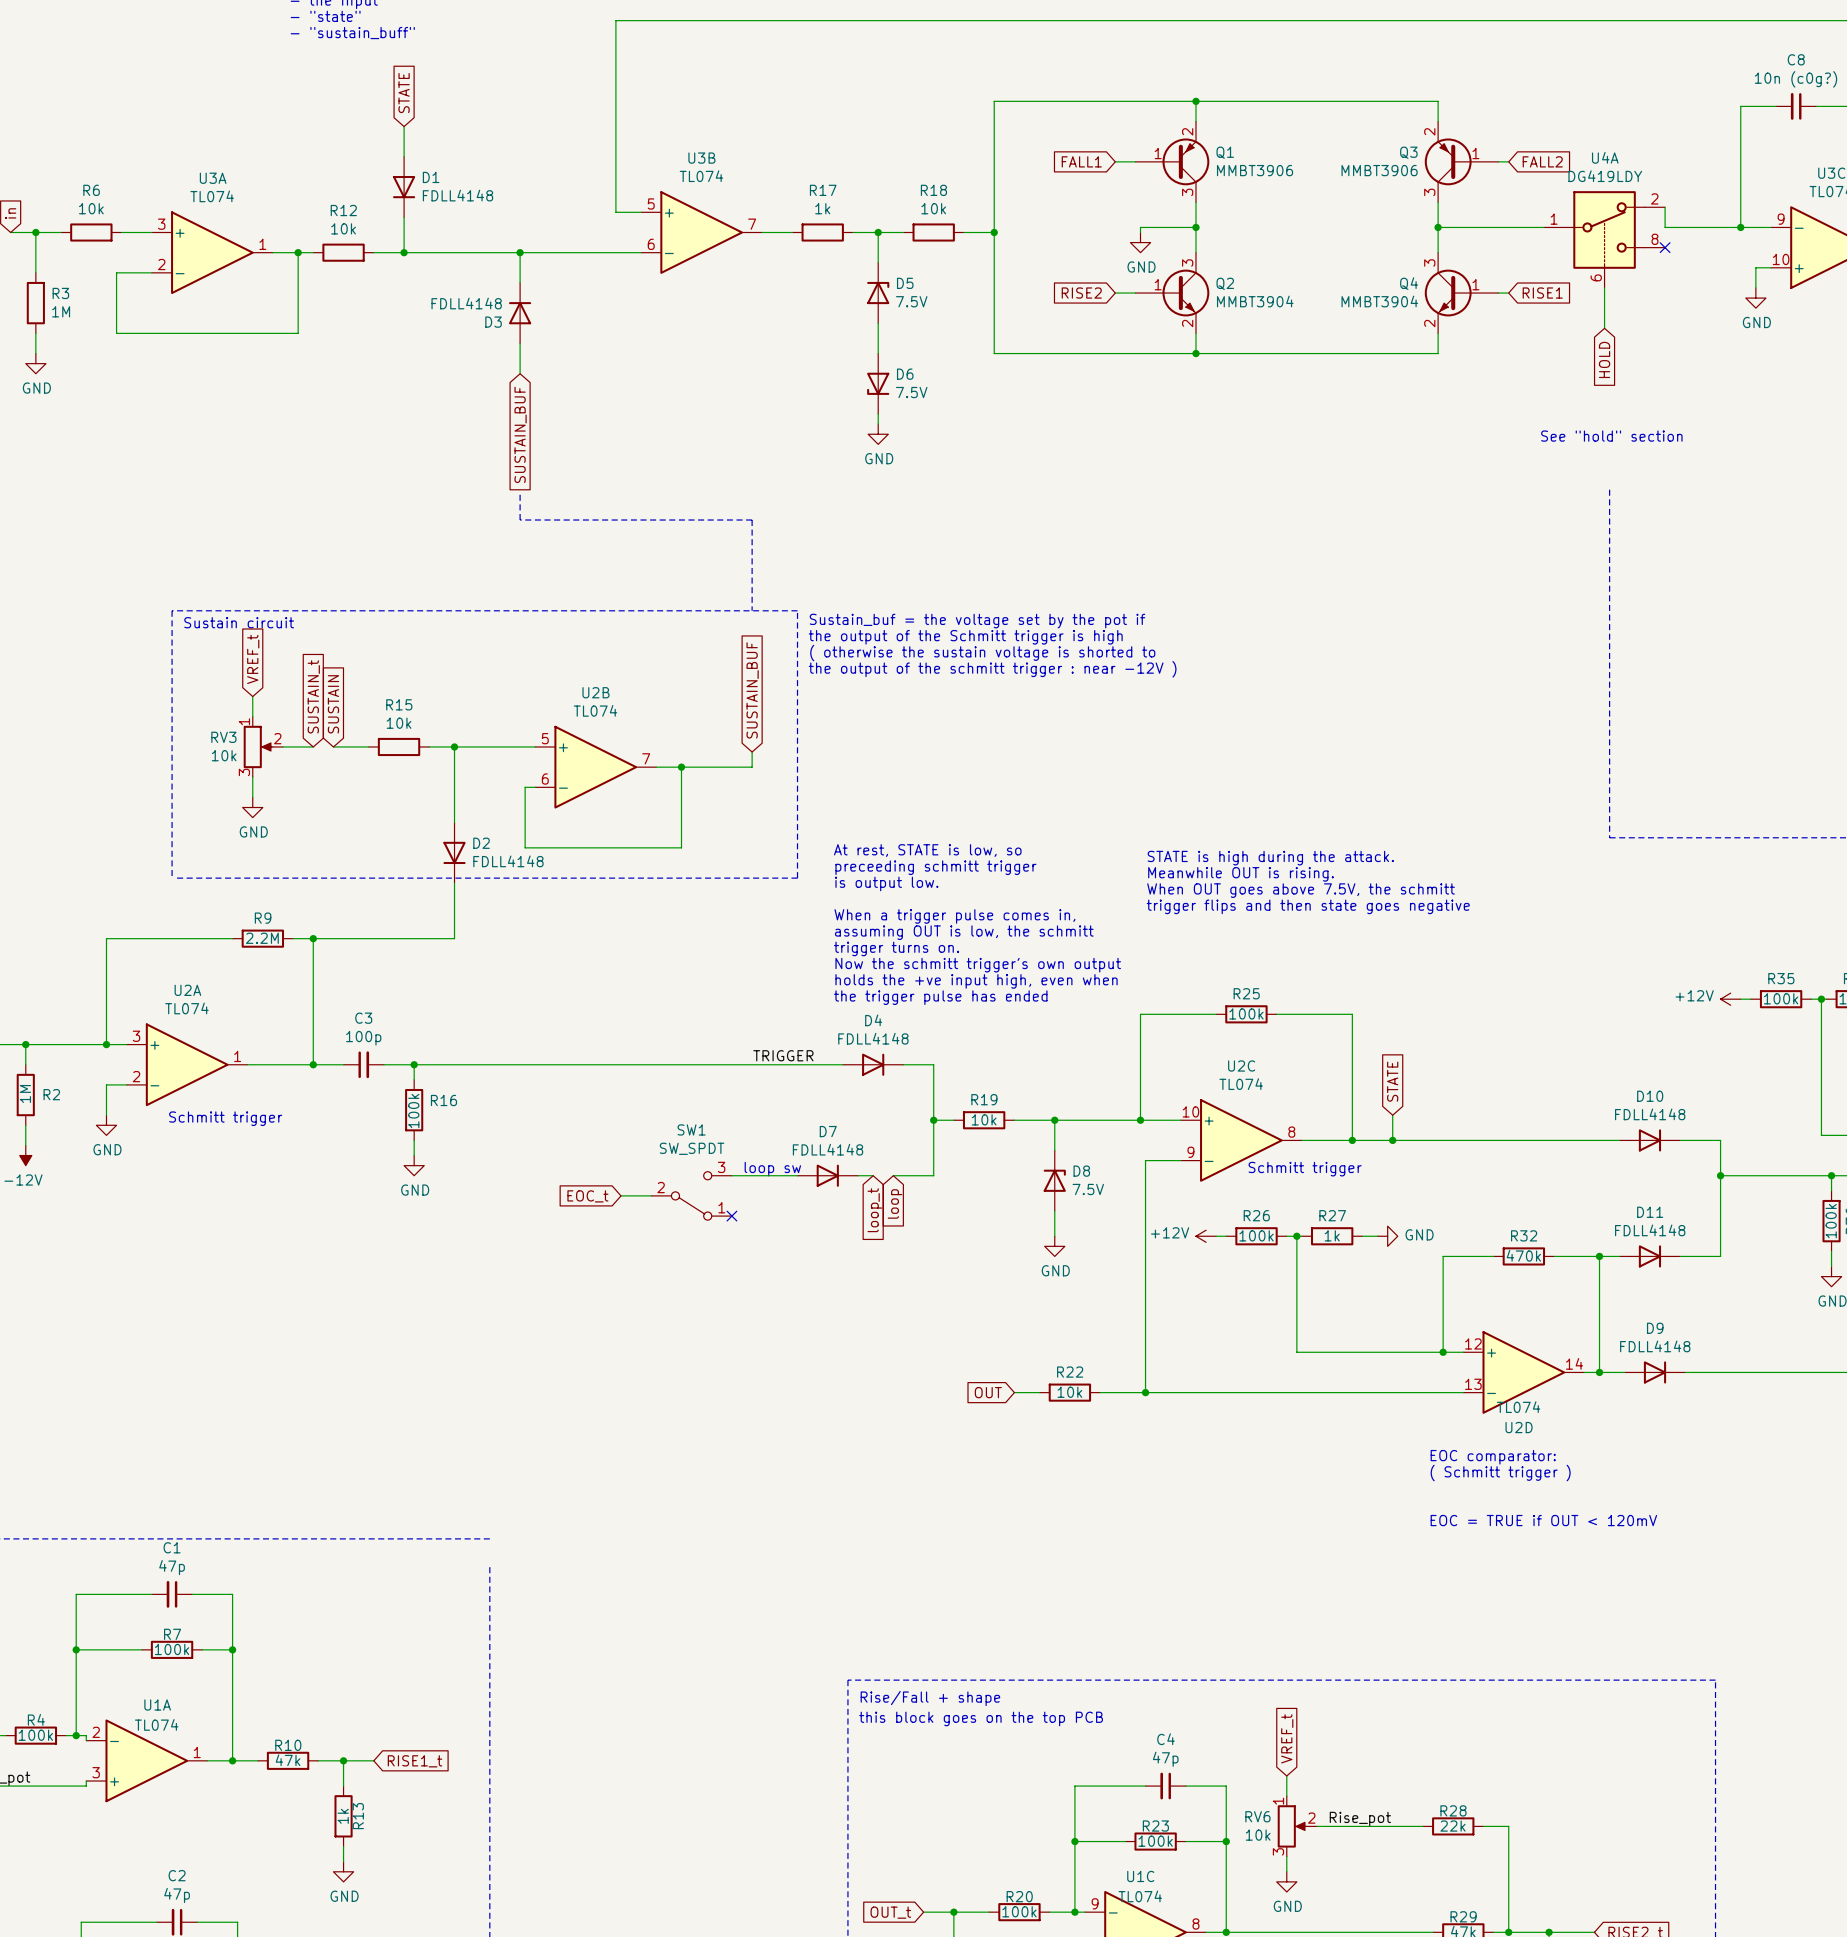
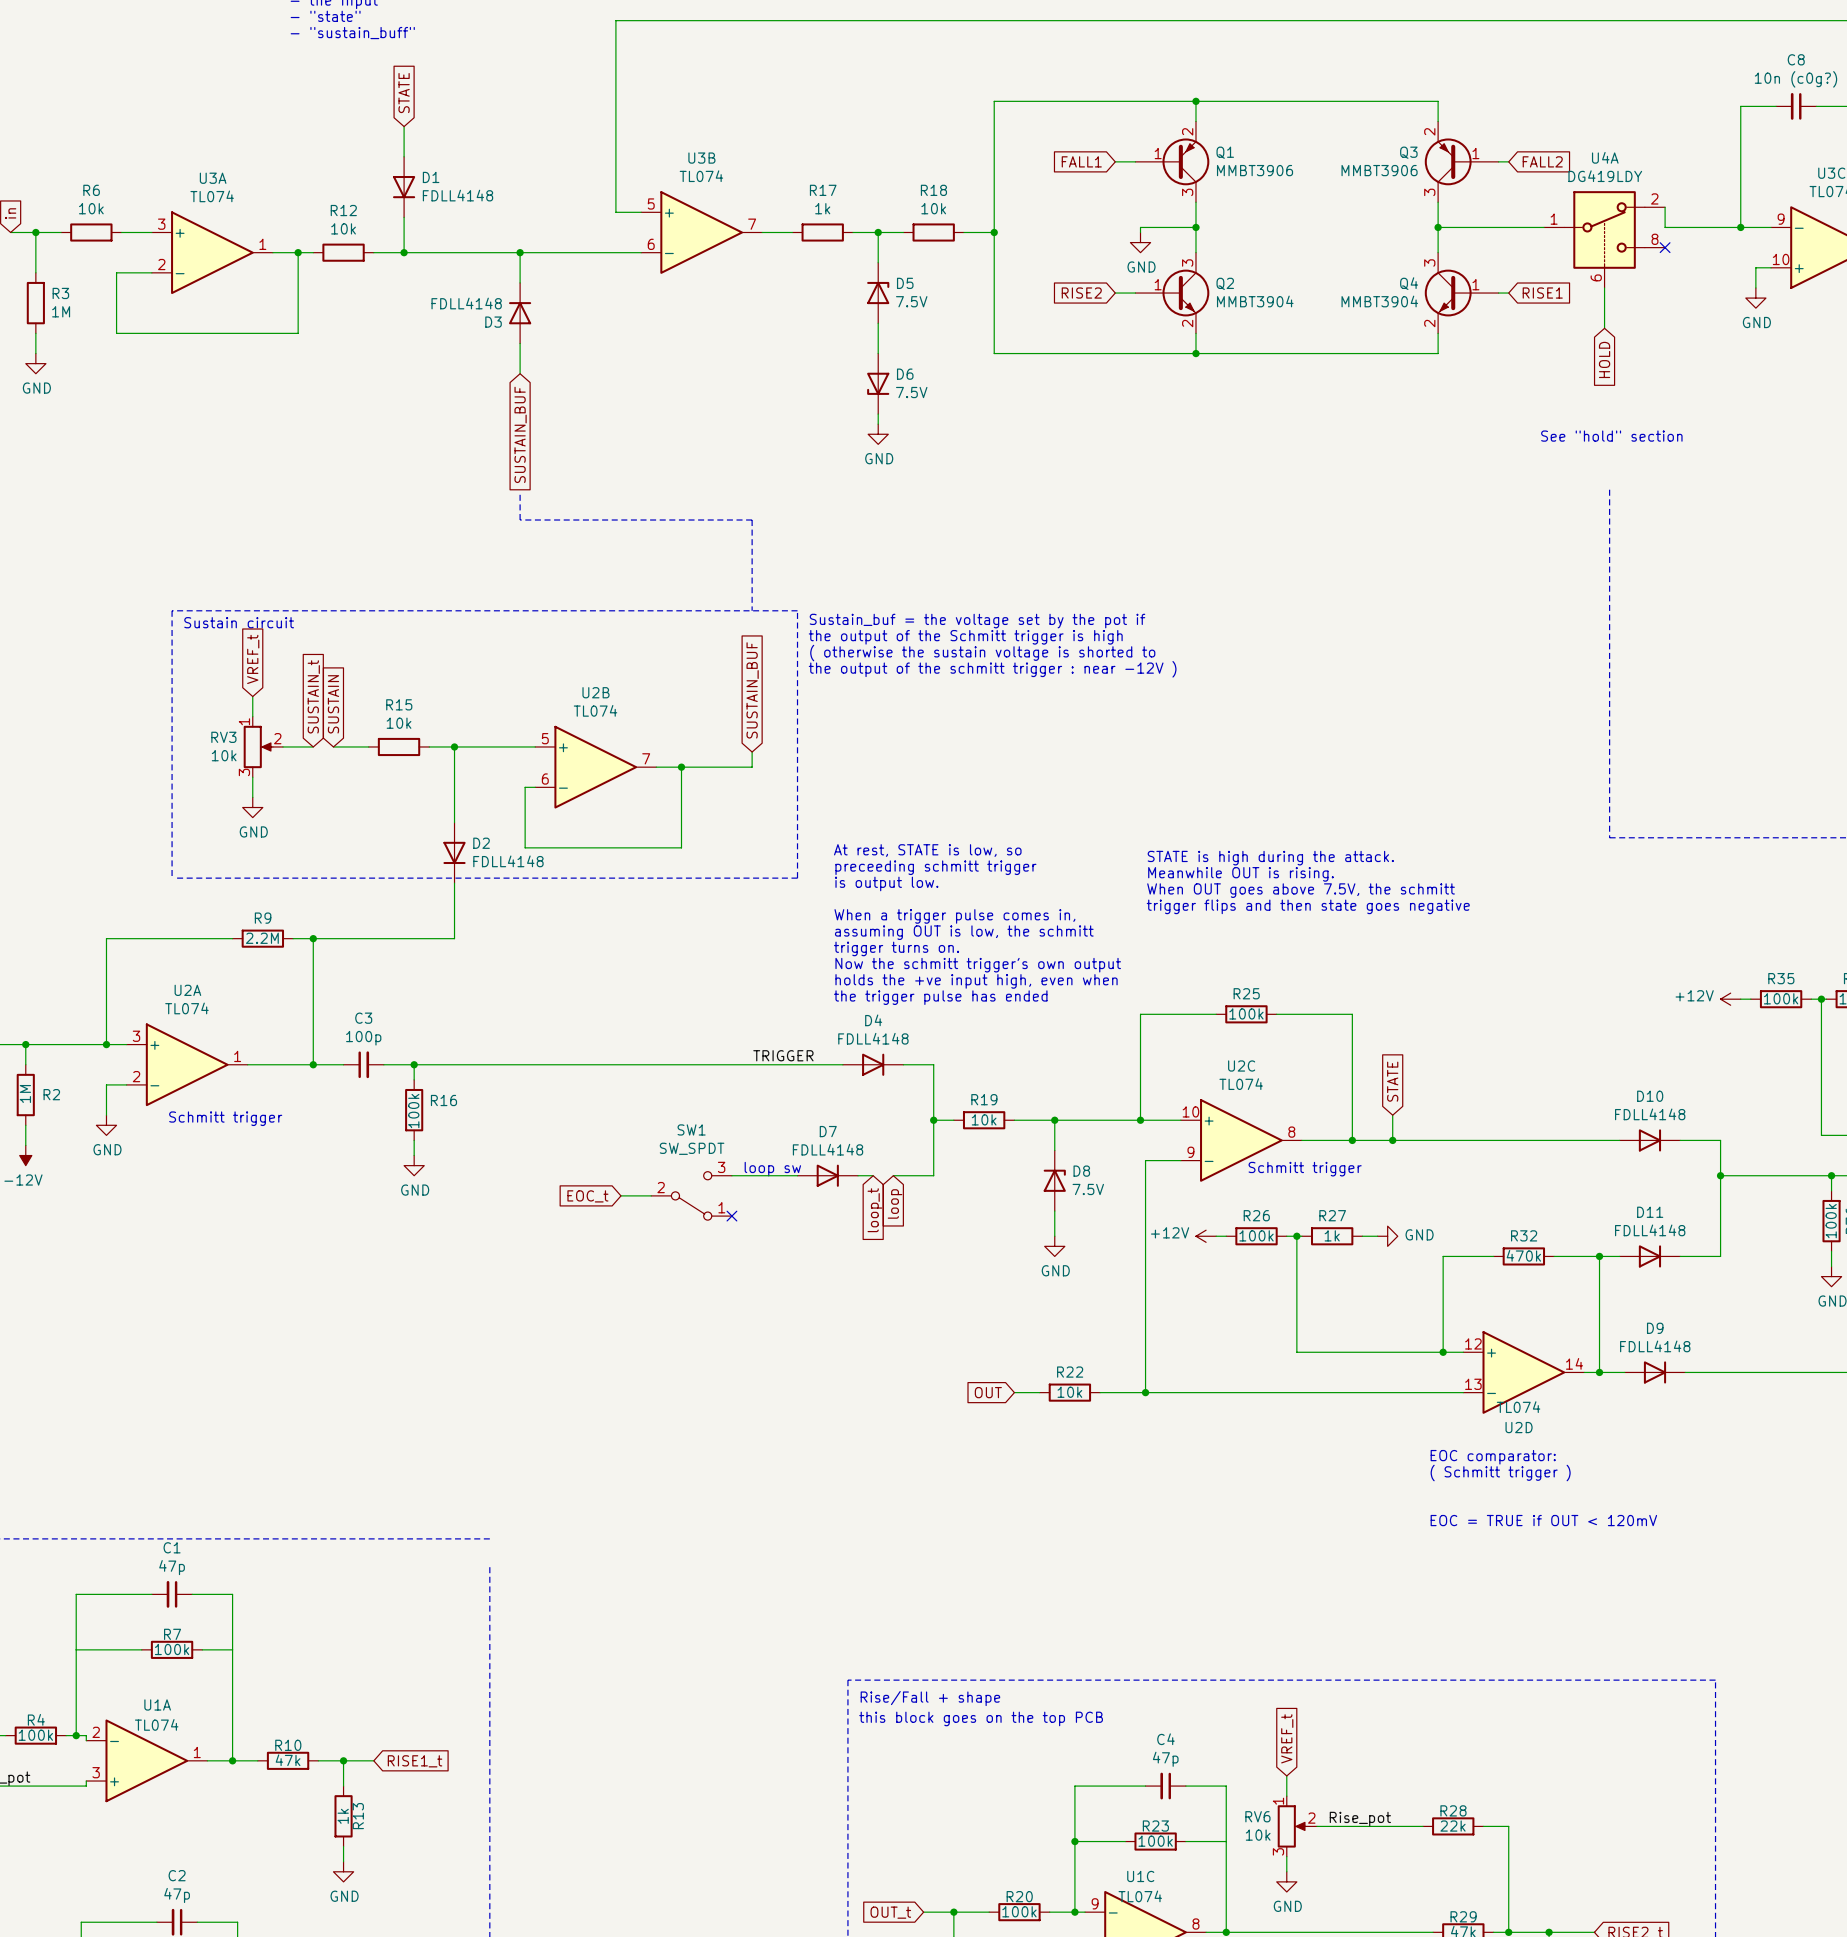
junction: (76, 1649) -> none
junction: (232, 1649) -> none
junction: (1226, 1841) -> none

